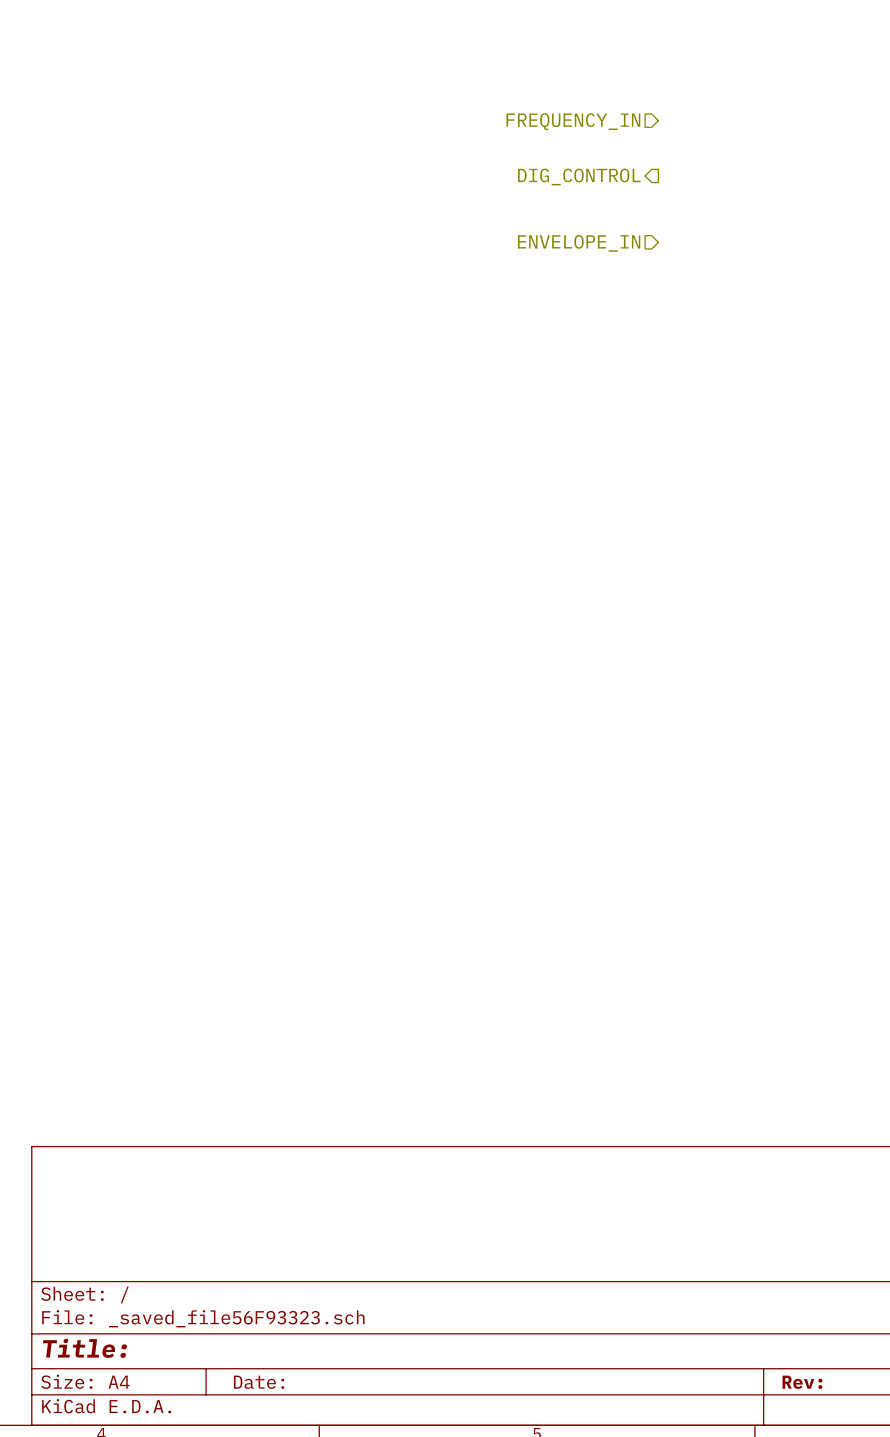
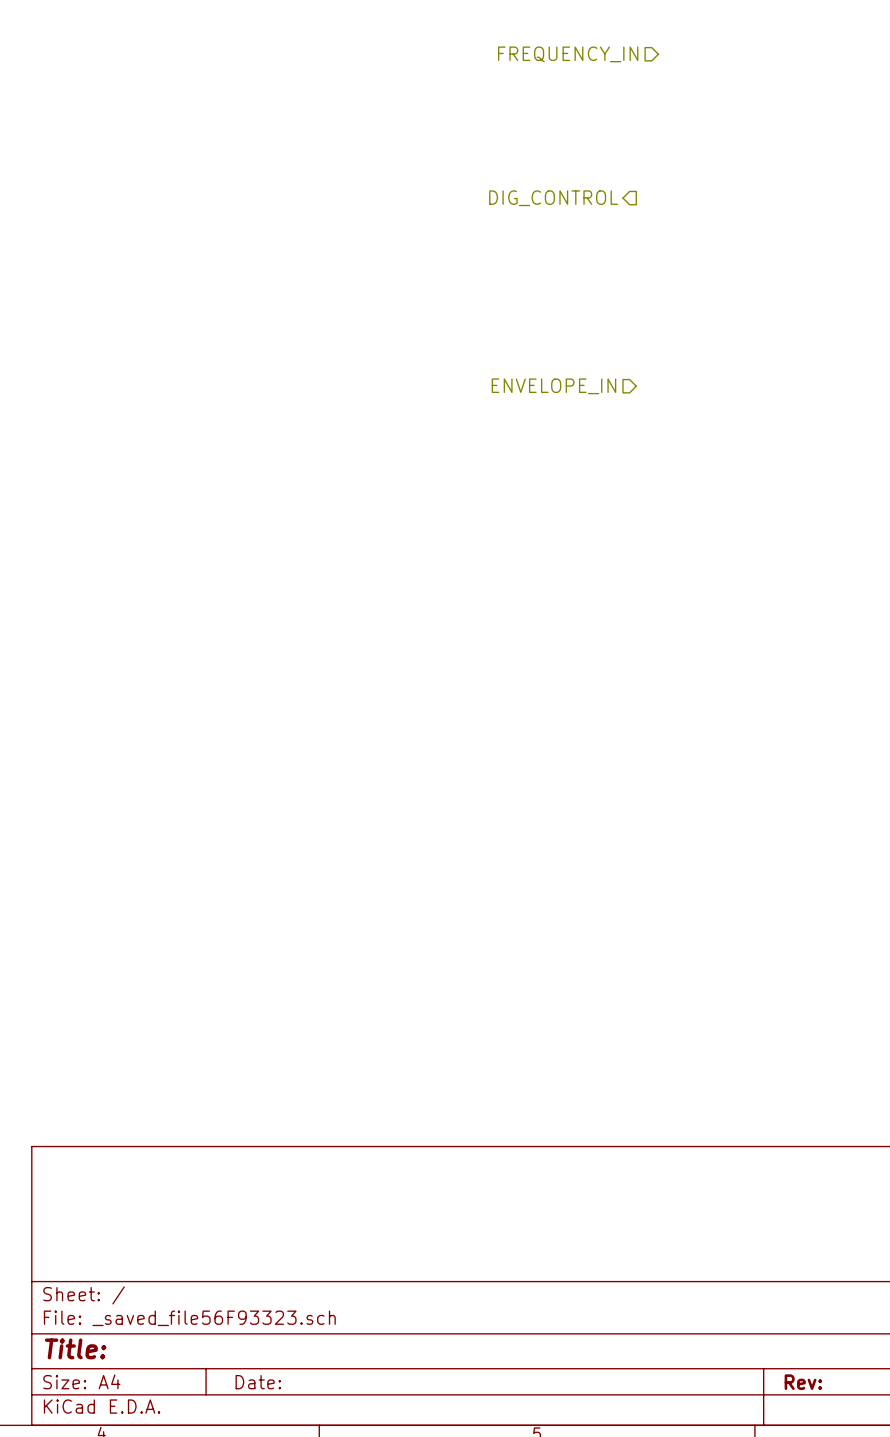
hierarchical label position: FREQUENCY_IN (573, 121) -> FREQUENCY_IN (568, 54)
hierarchical label position: DIG_CONTROL (579, 176) -> DIG_CONTROL (553, 198)
hierarchical label position: ENVELOPE_IN (579, 243) -> ENVELOPE_IN (553, 386)

